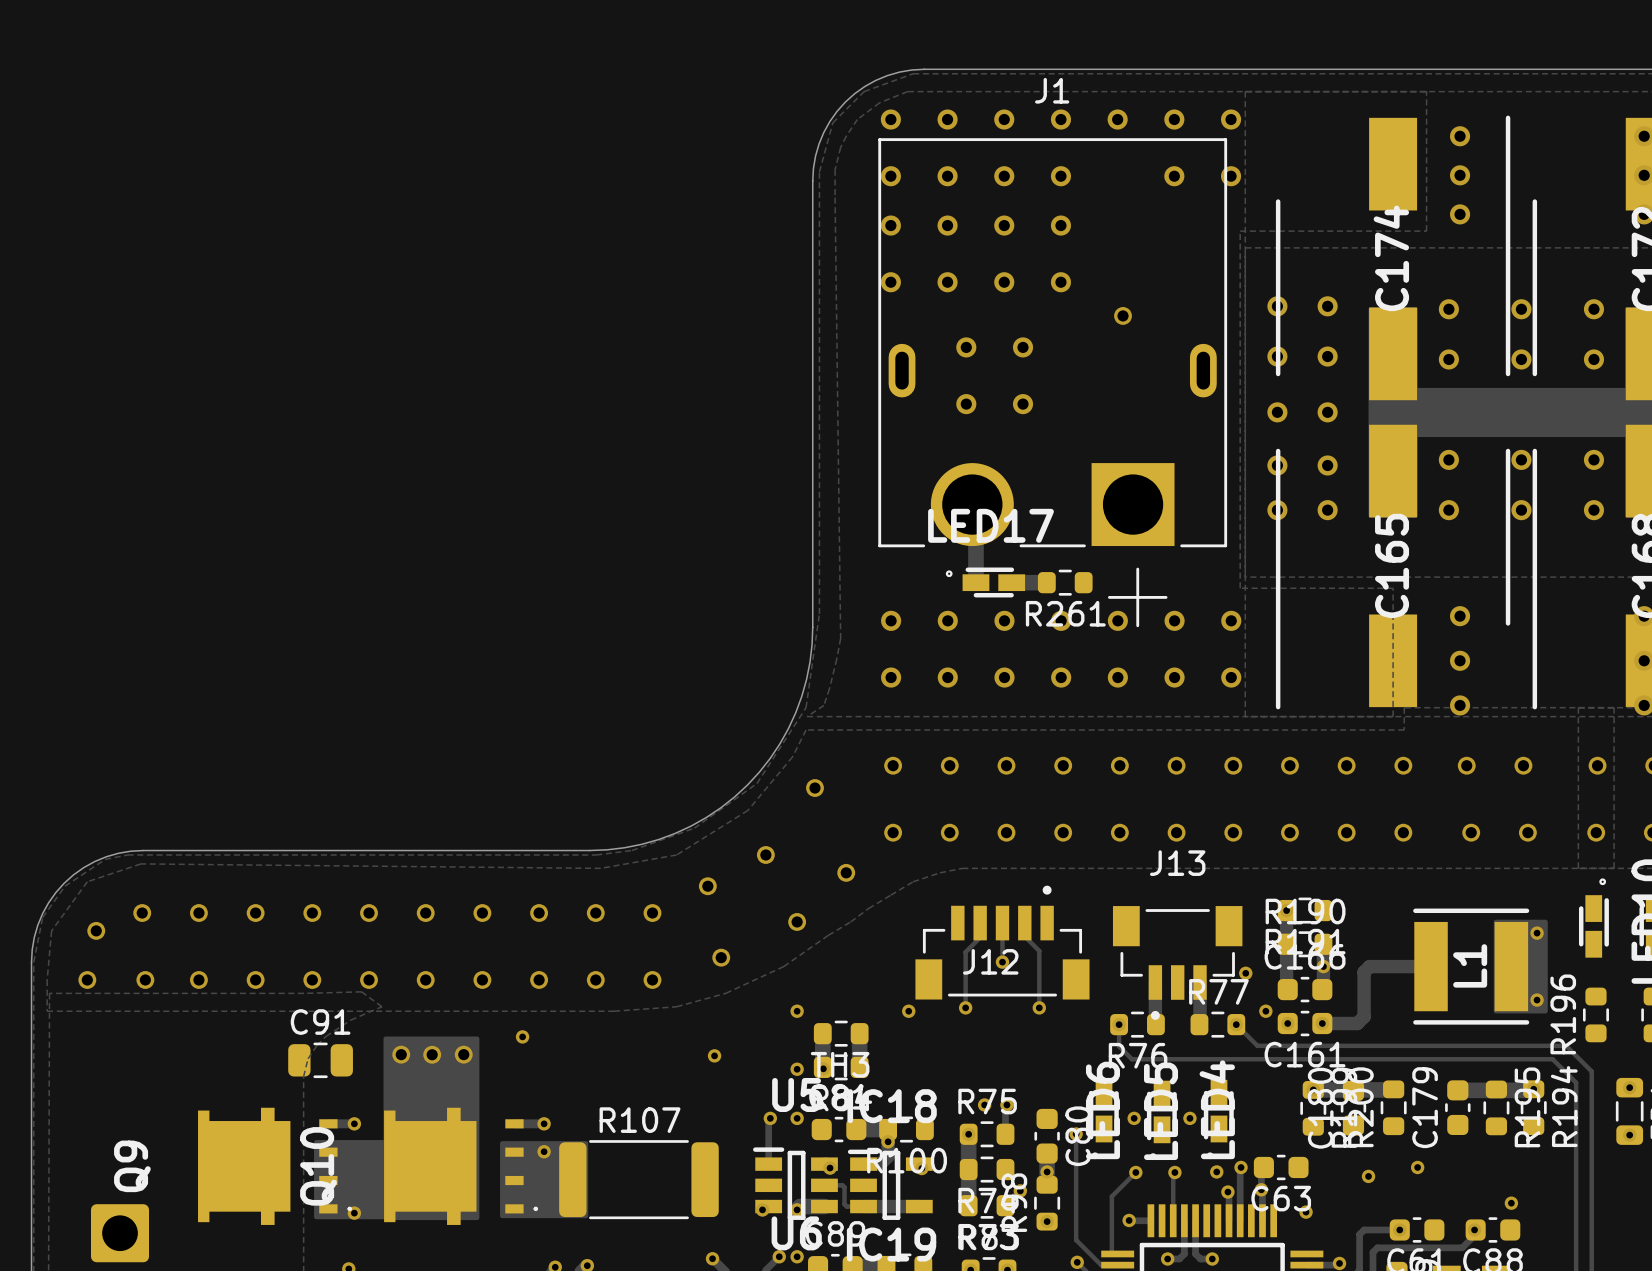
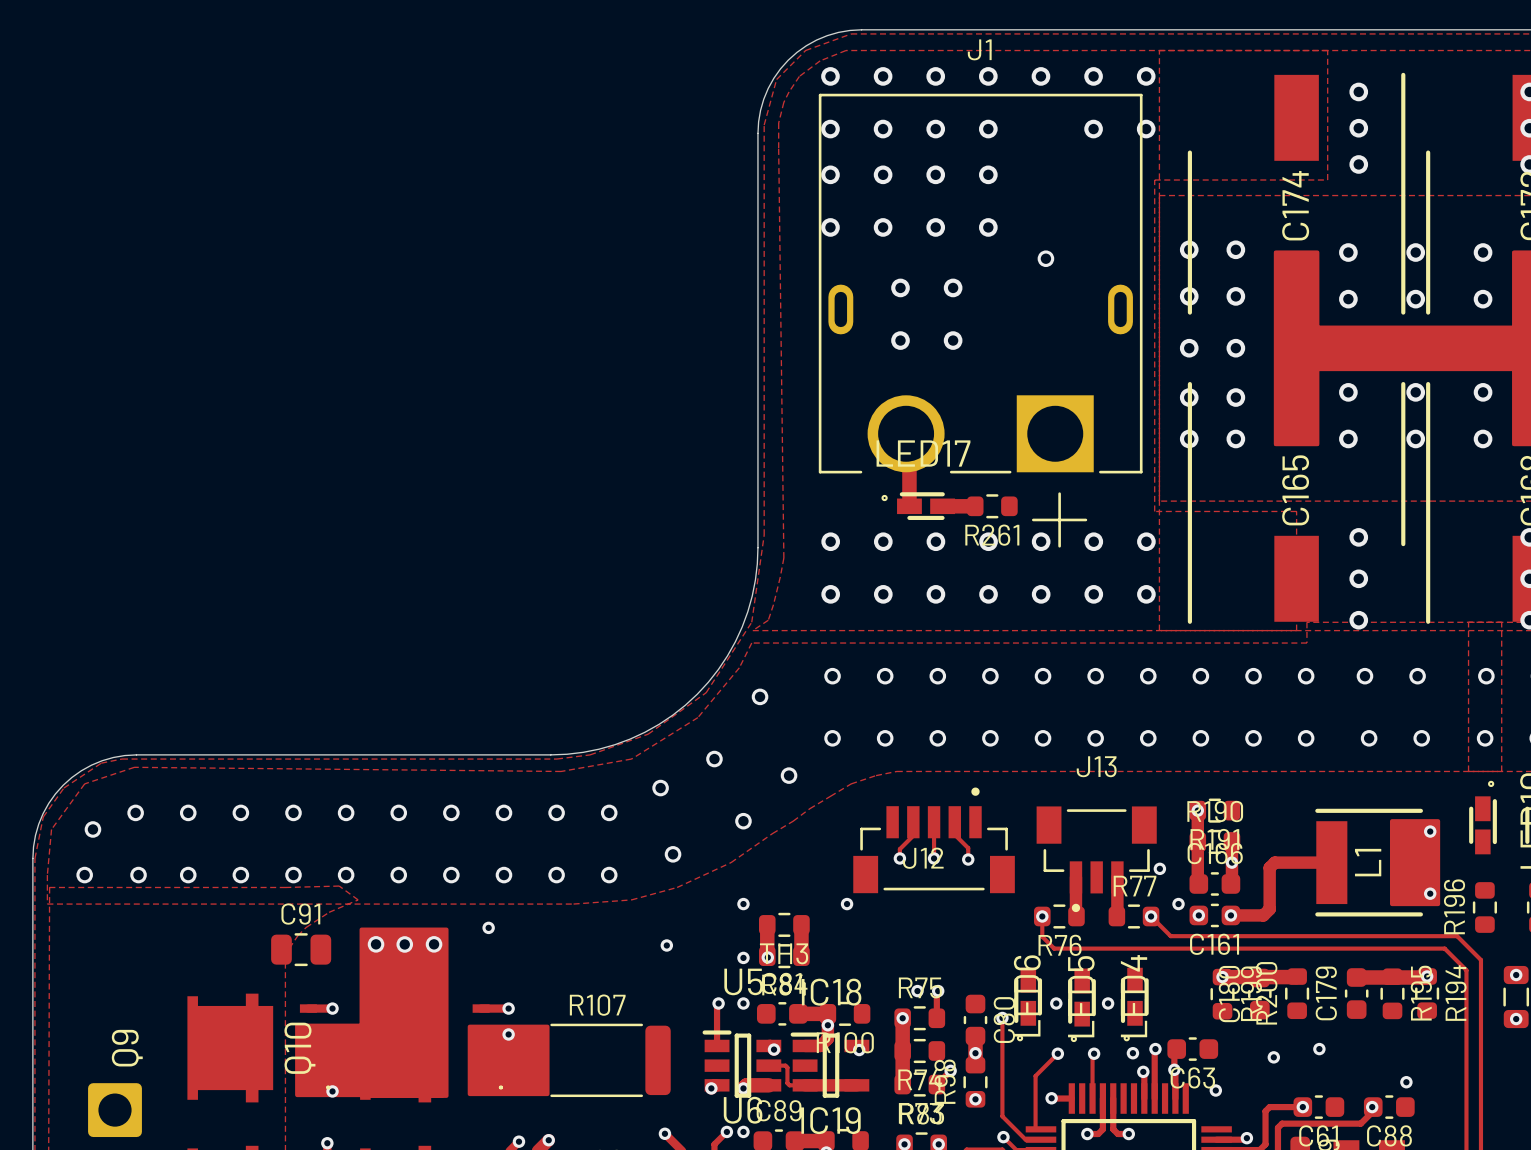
track: (965, 962) (965, 1007) -> none
via: none -> (899, 858)
track: (1039, 963) (1039, 1007) -> none
via: none -> (968, 859)
via: (965, 1007) -> none
via: (1039, 1007) -> none

